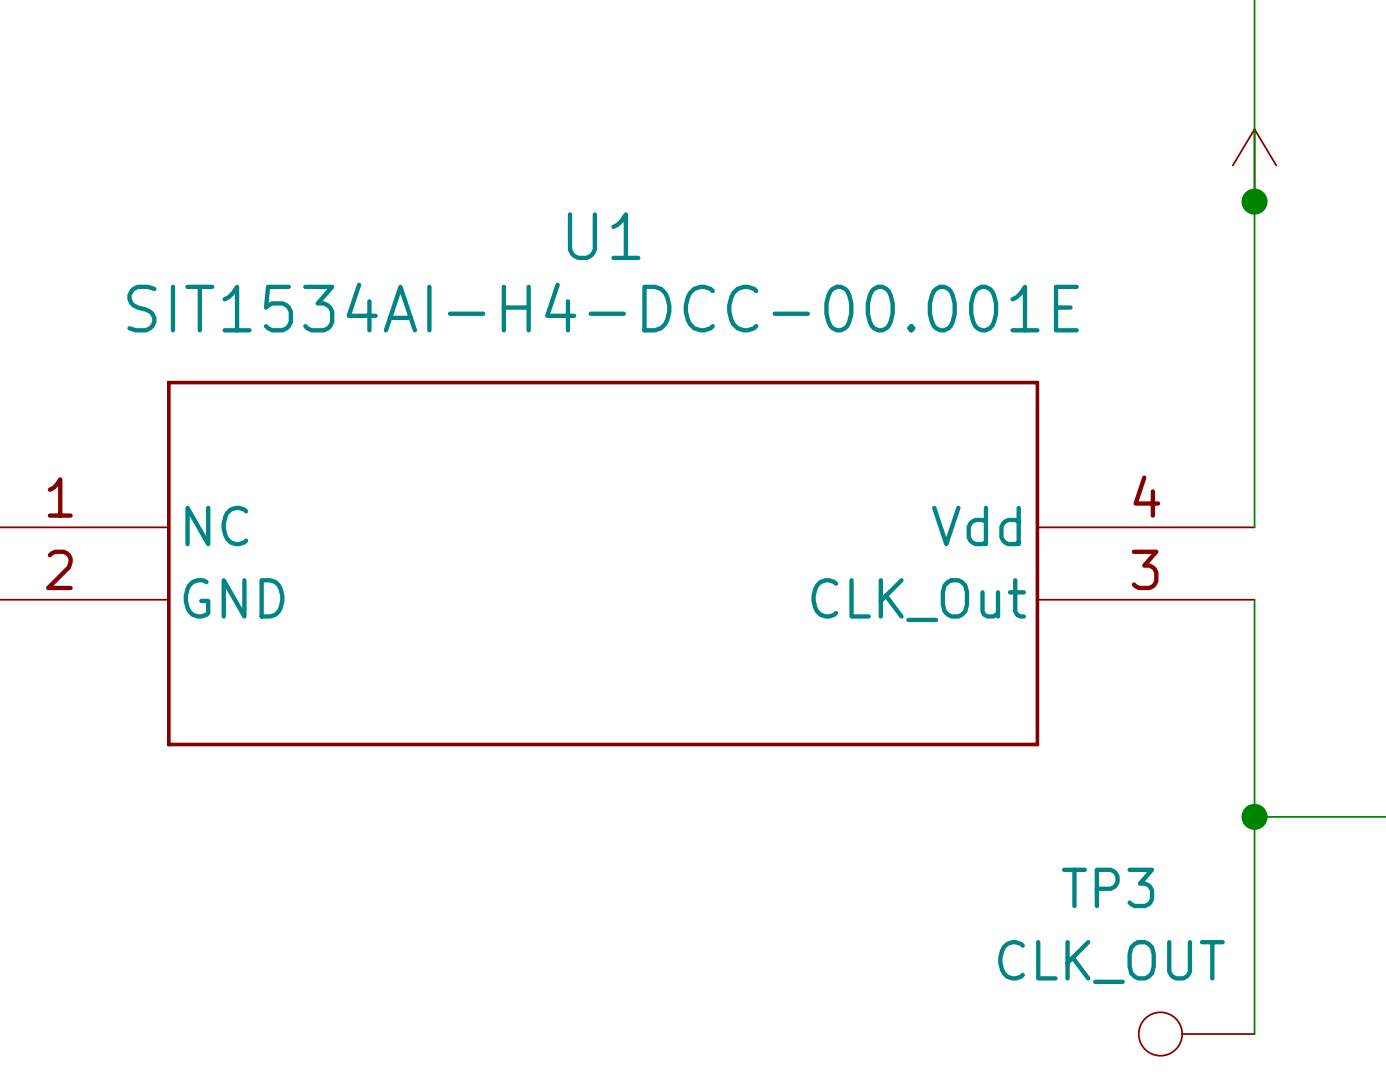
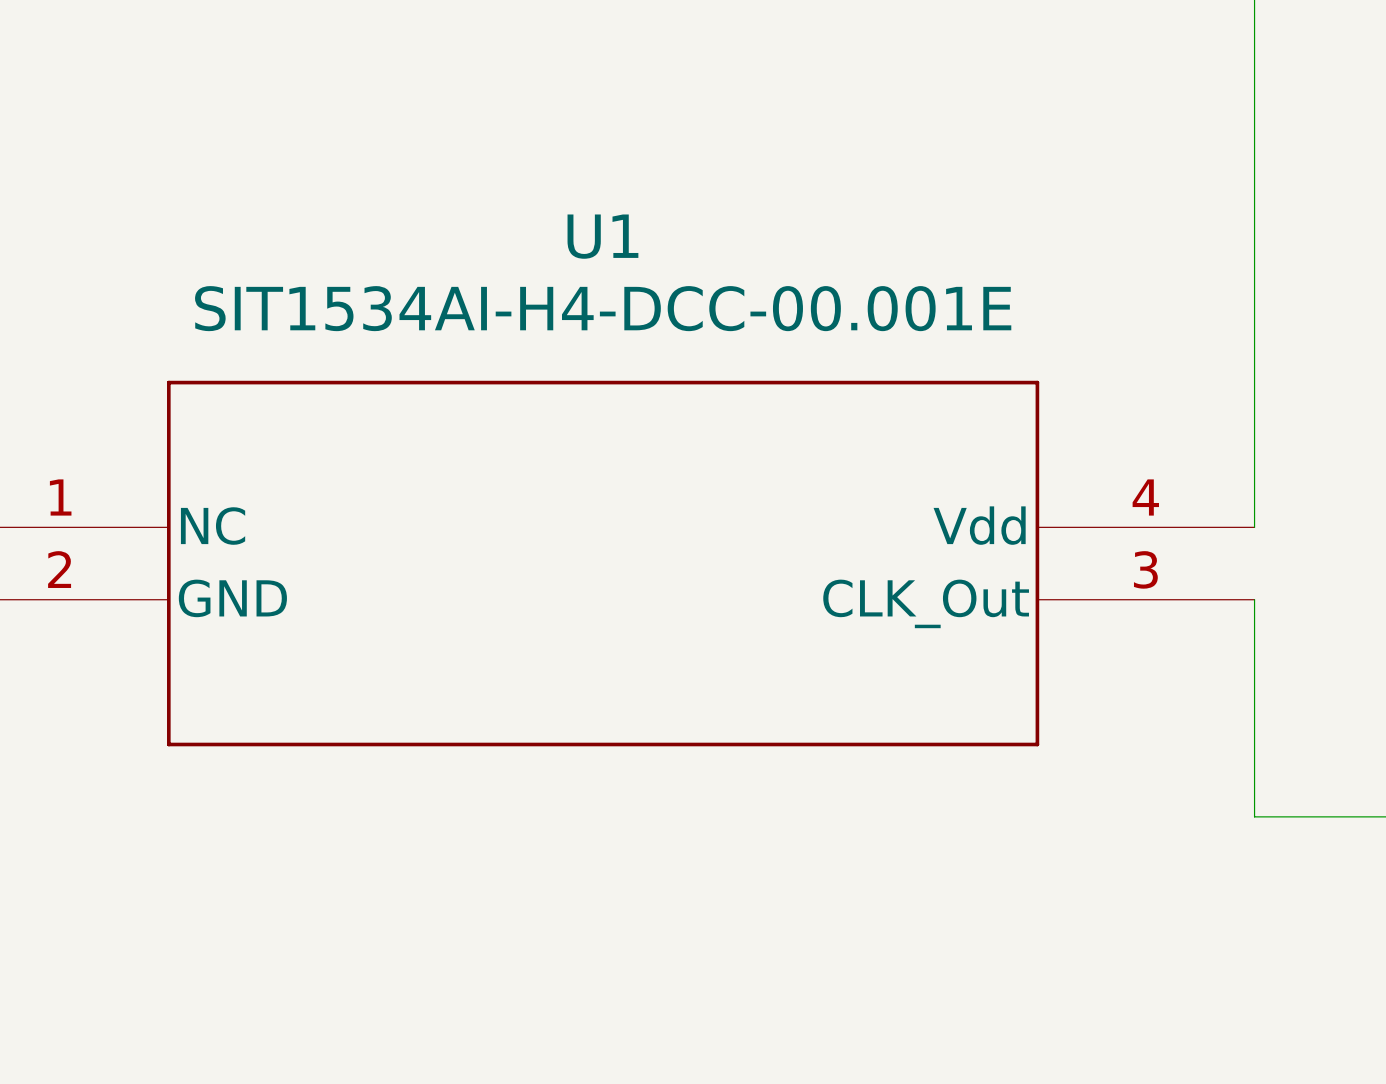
power symbol: (1254, 165) -> none
junction: (1254, 201) -> none
wire: (1254, 816) (1254, 1034) -> none
junction: (1254, 816) -> none
TP3: CLK_OUT (1196, 1034) -> none

